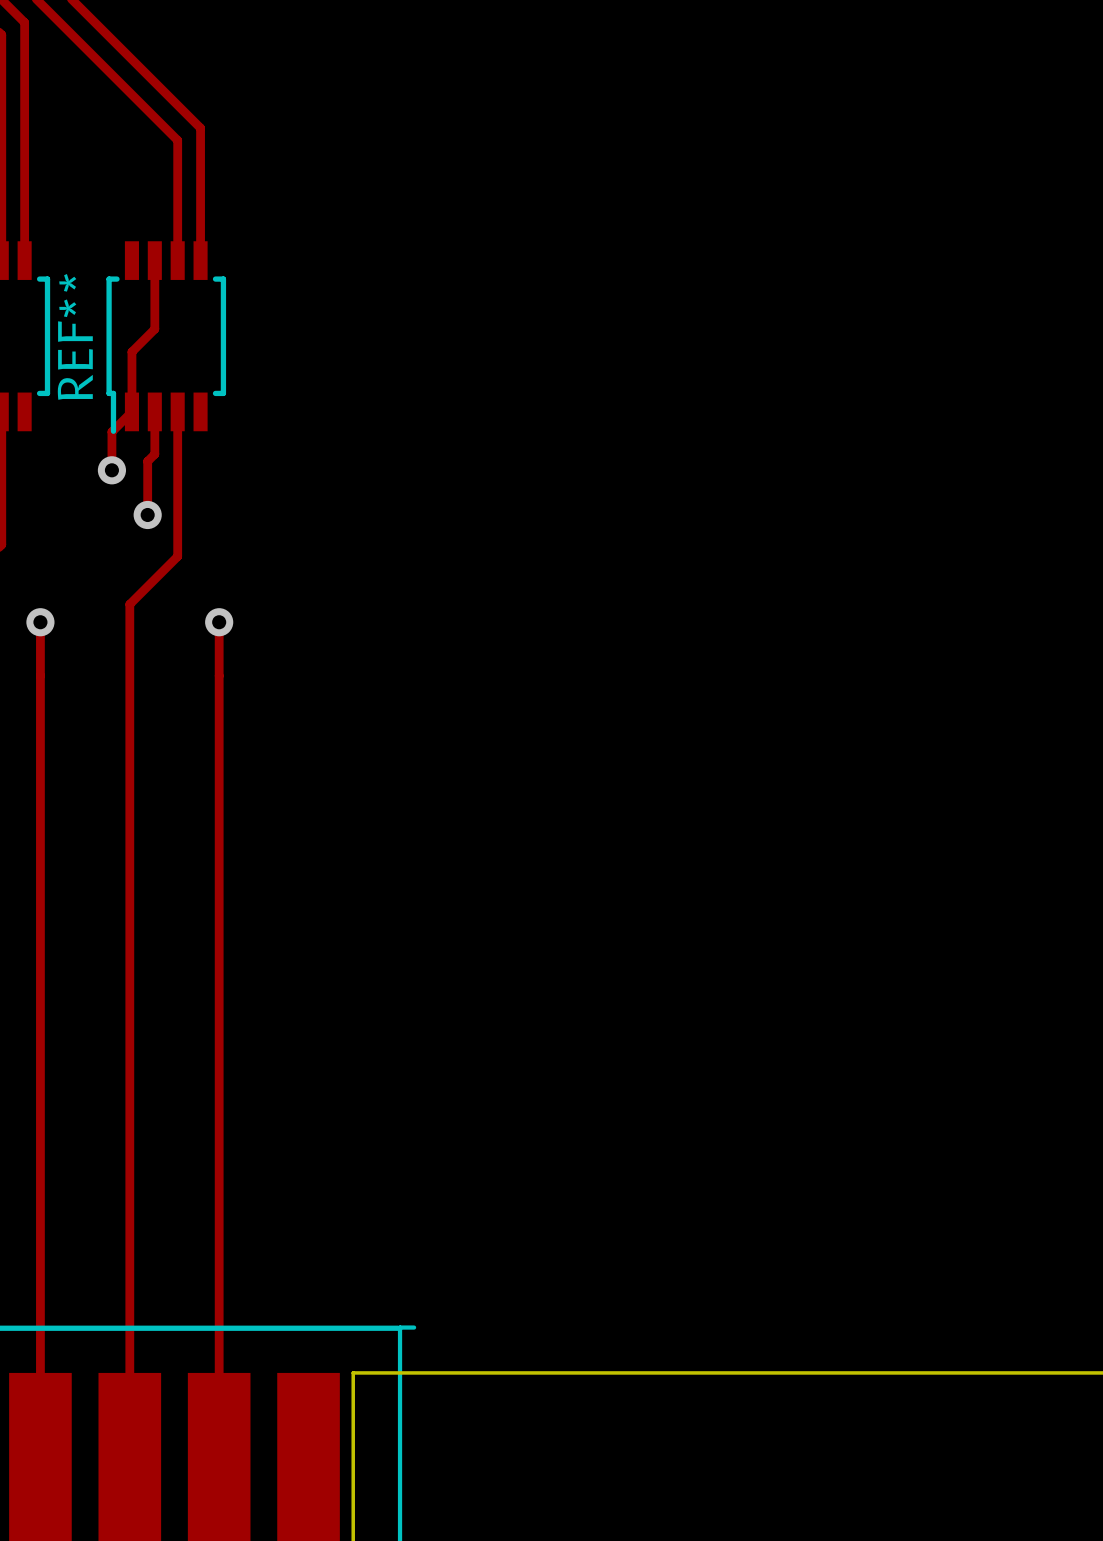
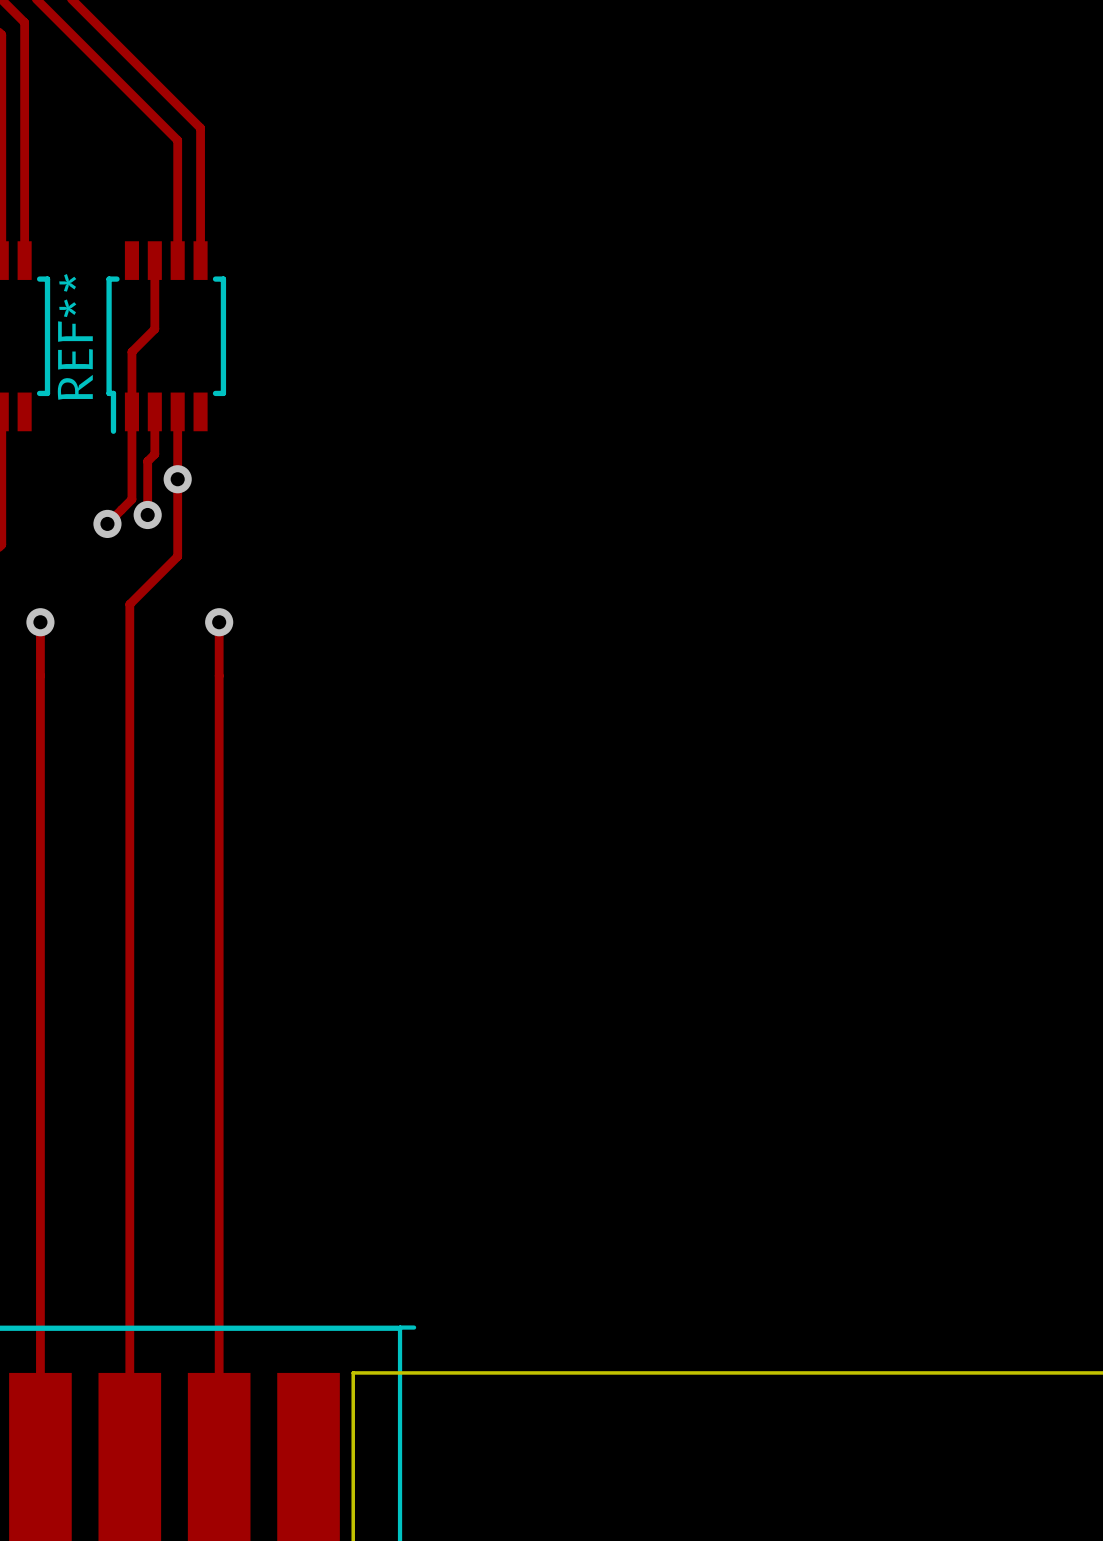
track: (131, 411) (111, 431) (111, 470) -> (131, 411) (131, 499) (107, 523)
via: (111, 470) -> none
via: none -> (177, 479)
via: none -> (107, 523)

